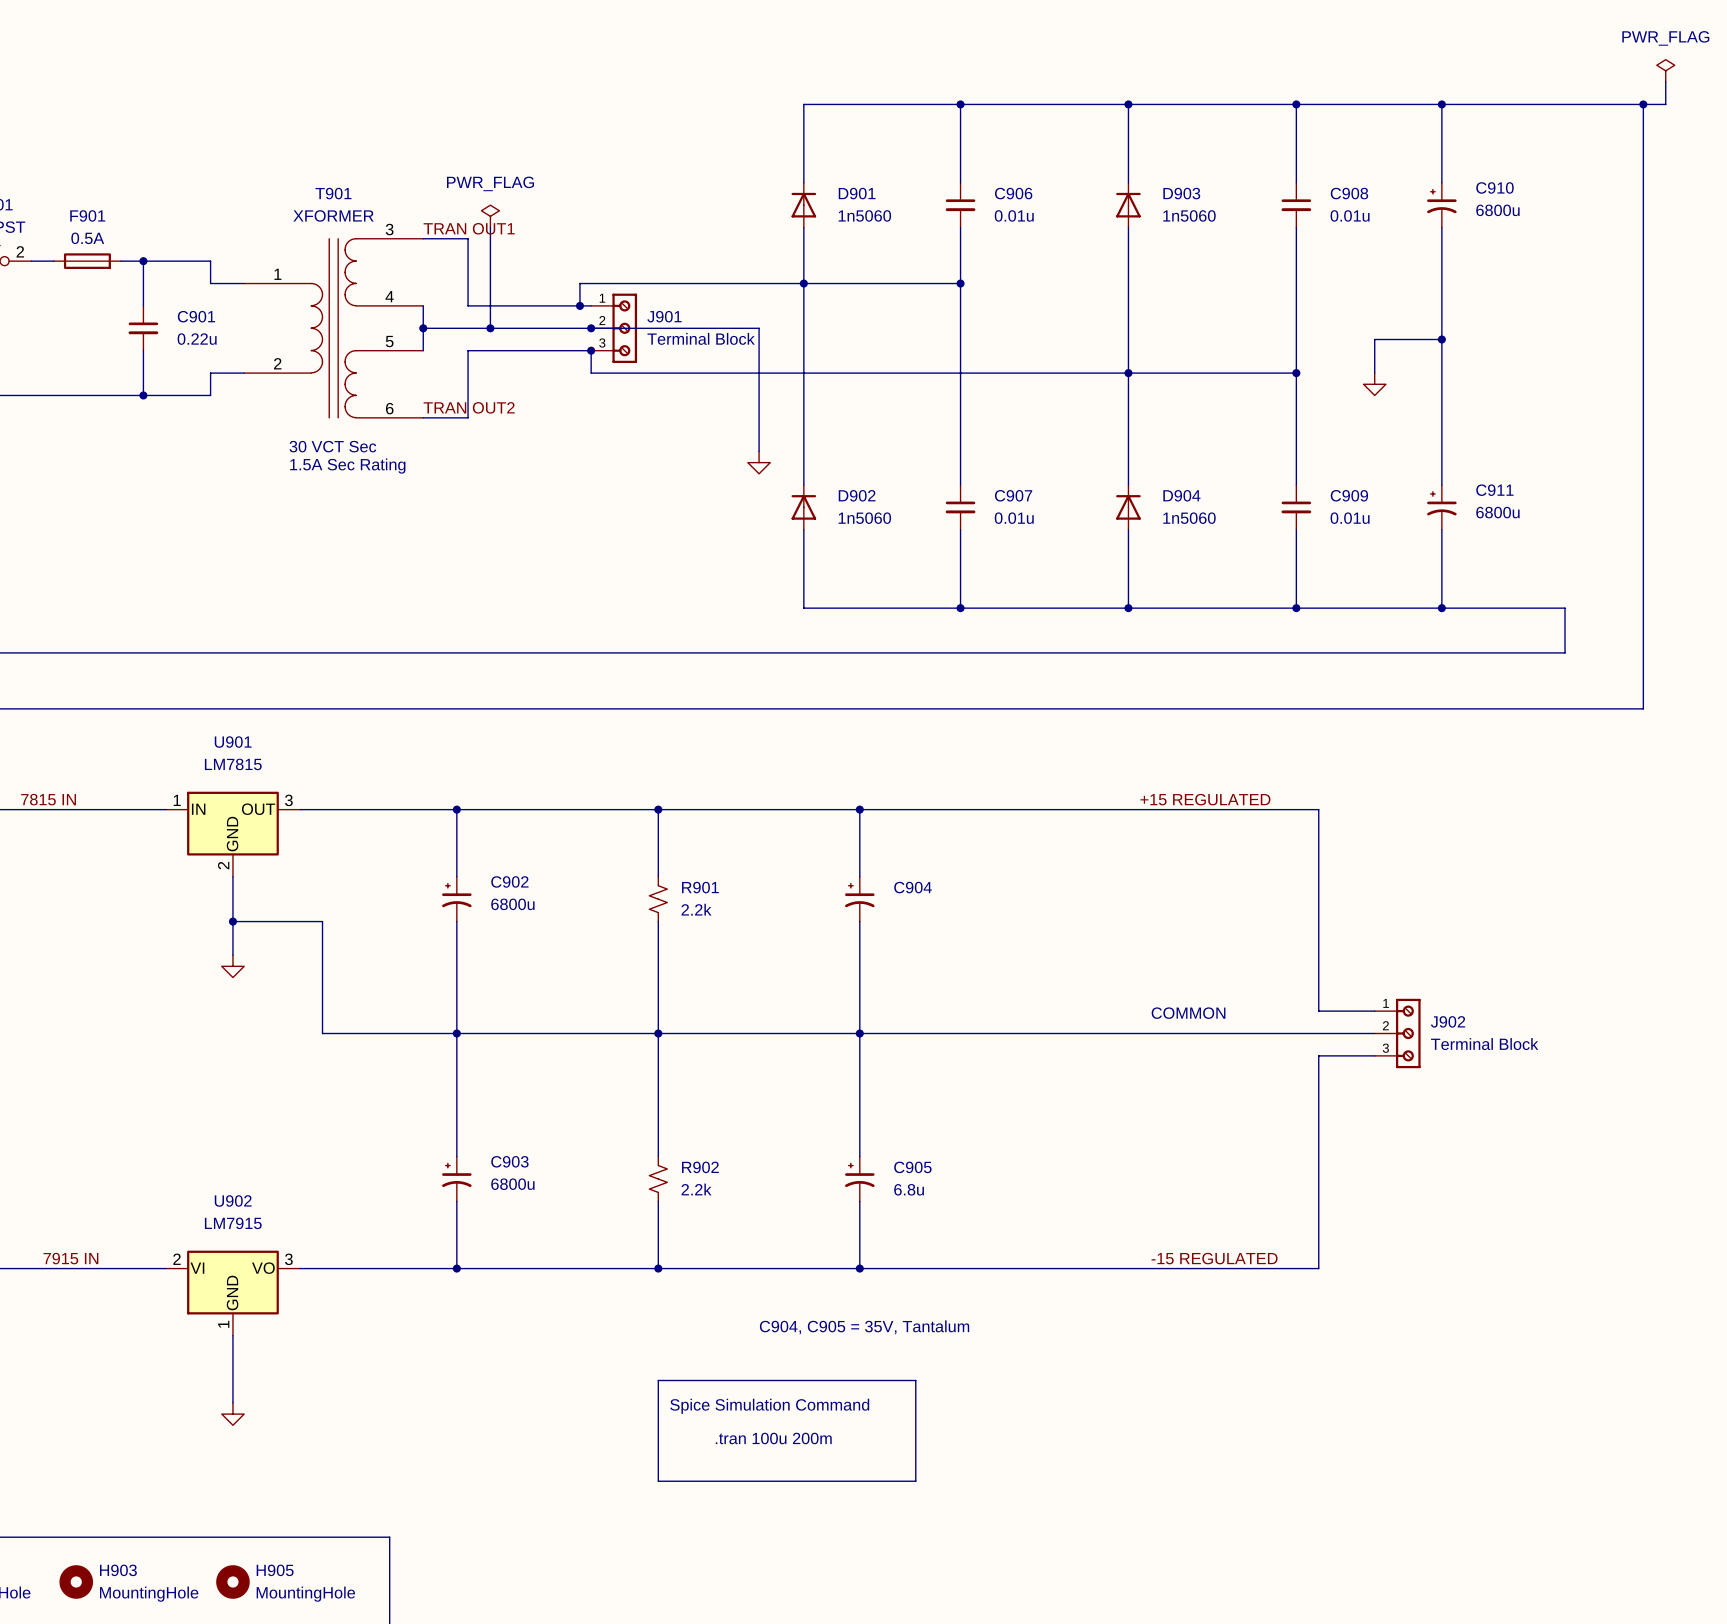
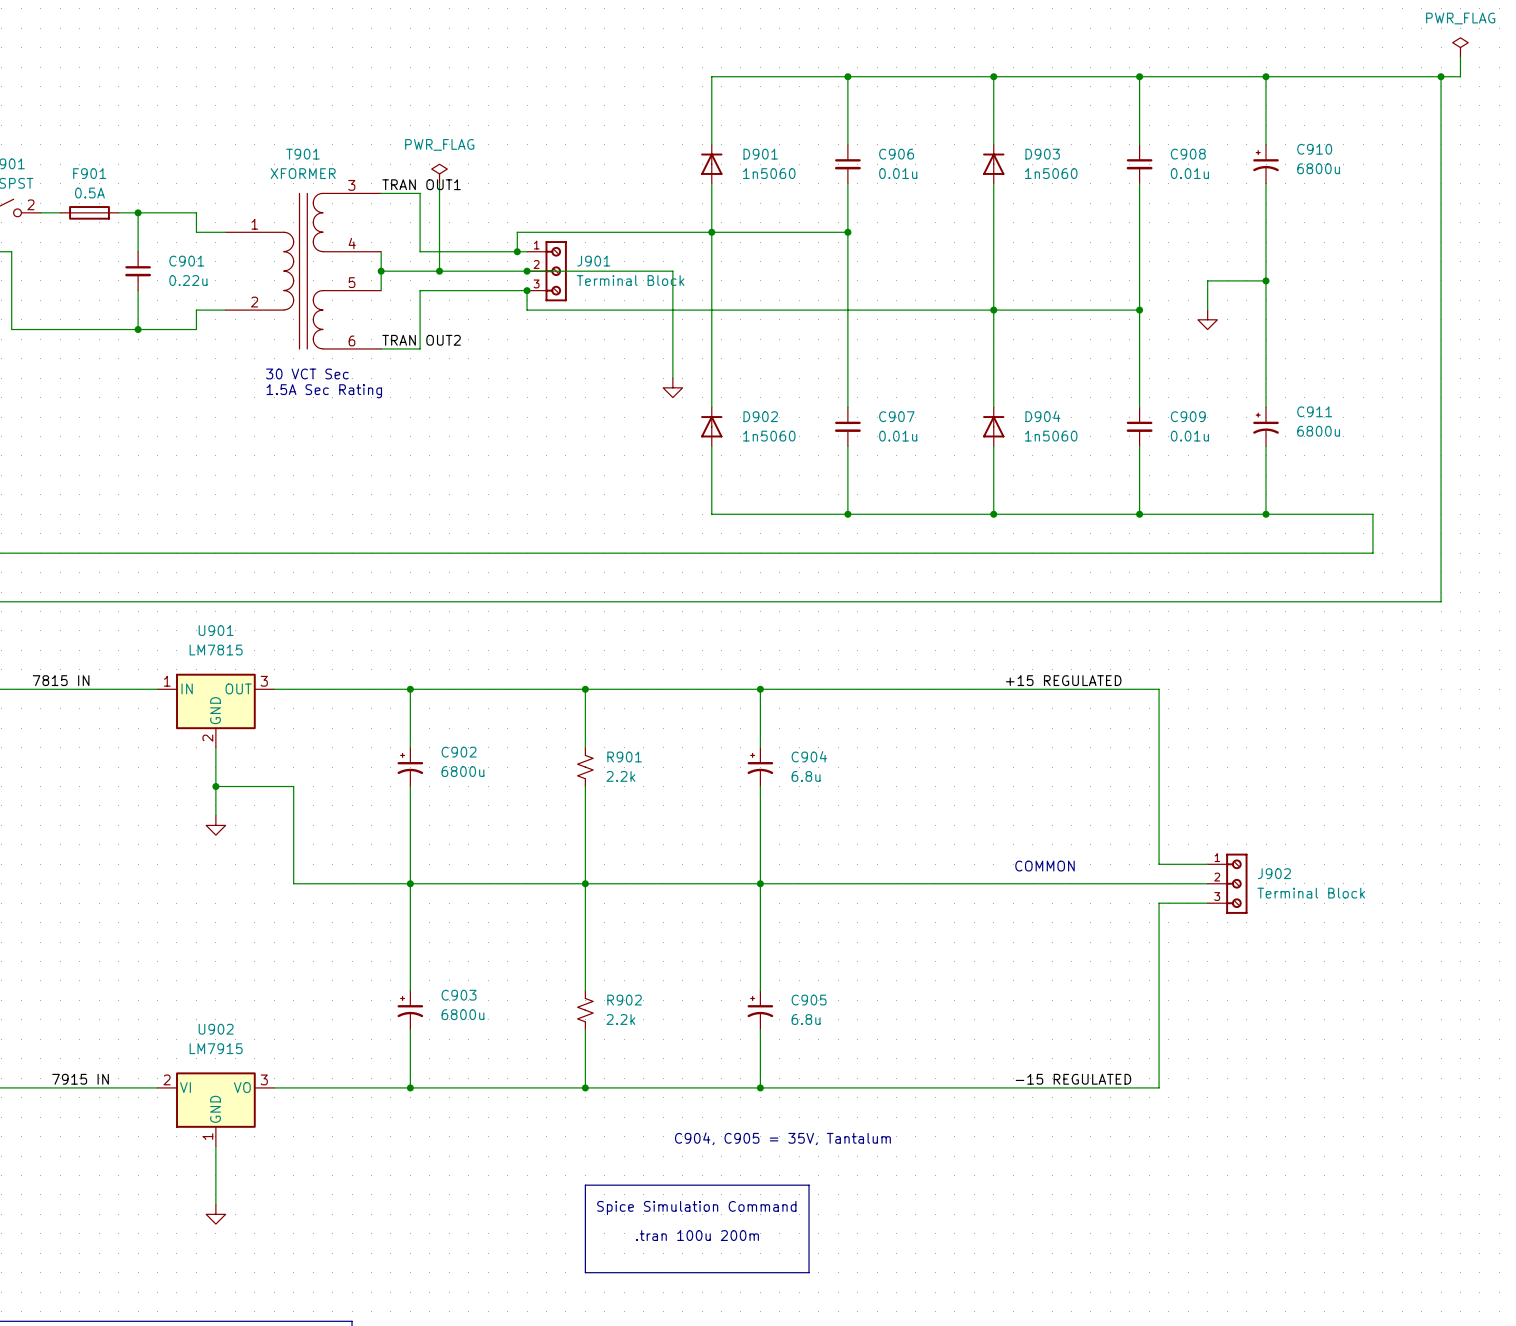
C904 value: none -> 6.8u (806, 776)

